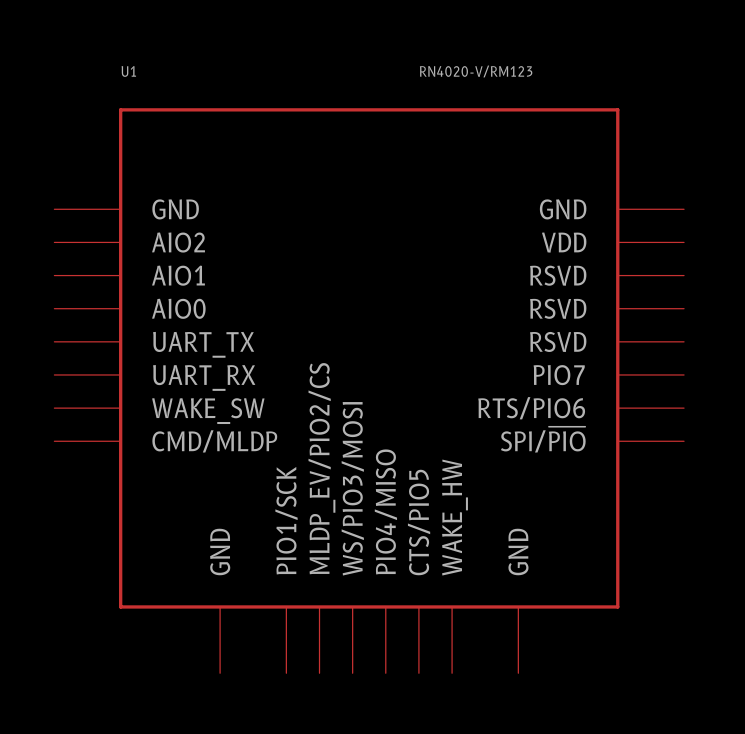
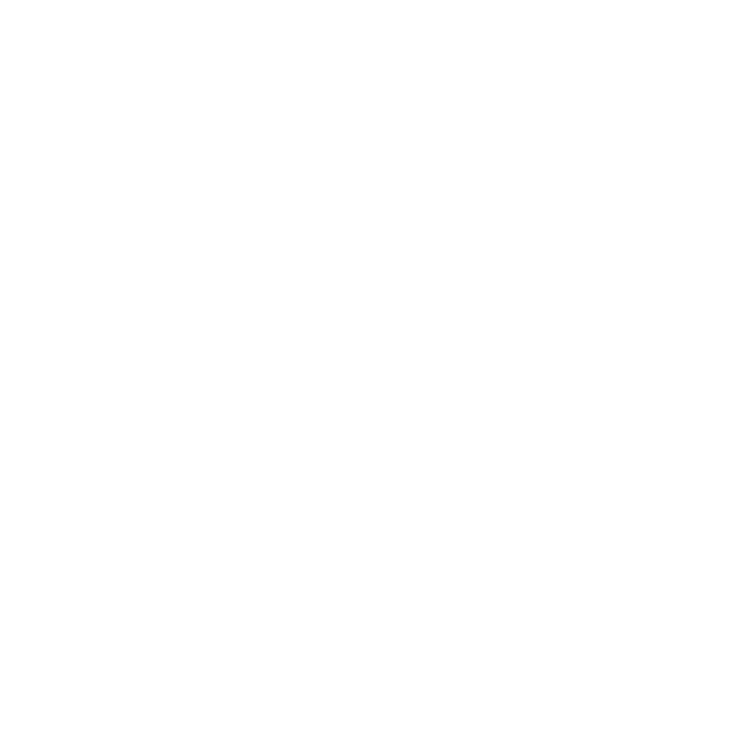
U1: RN4020-V/RM123 (369, 390) -> none

